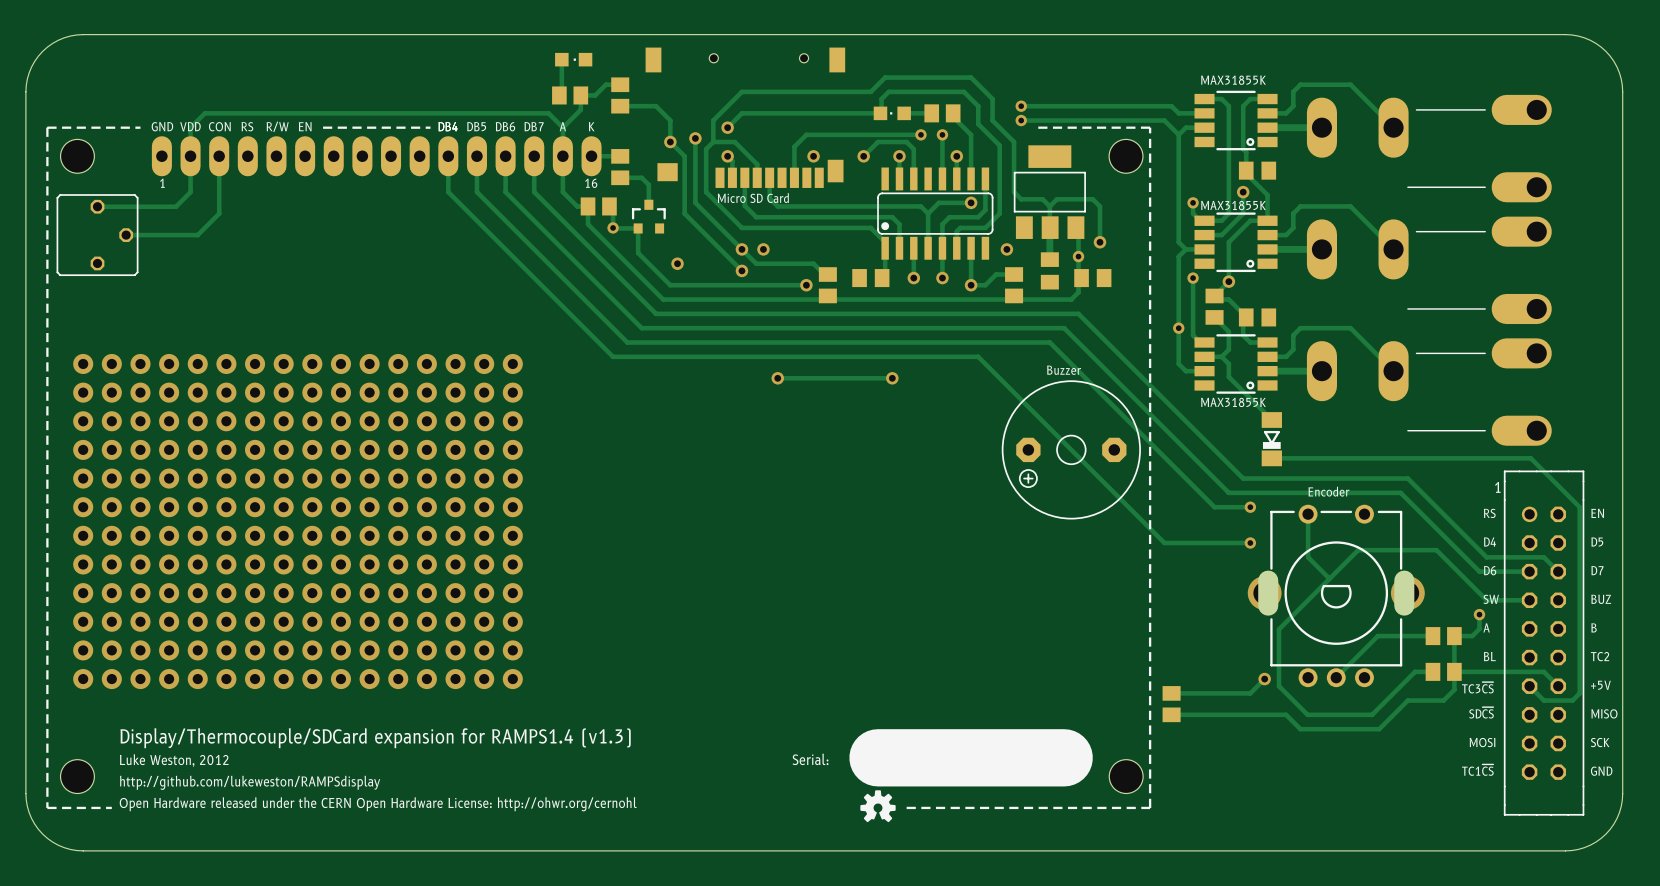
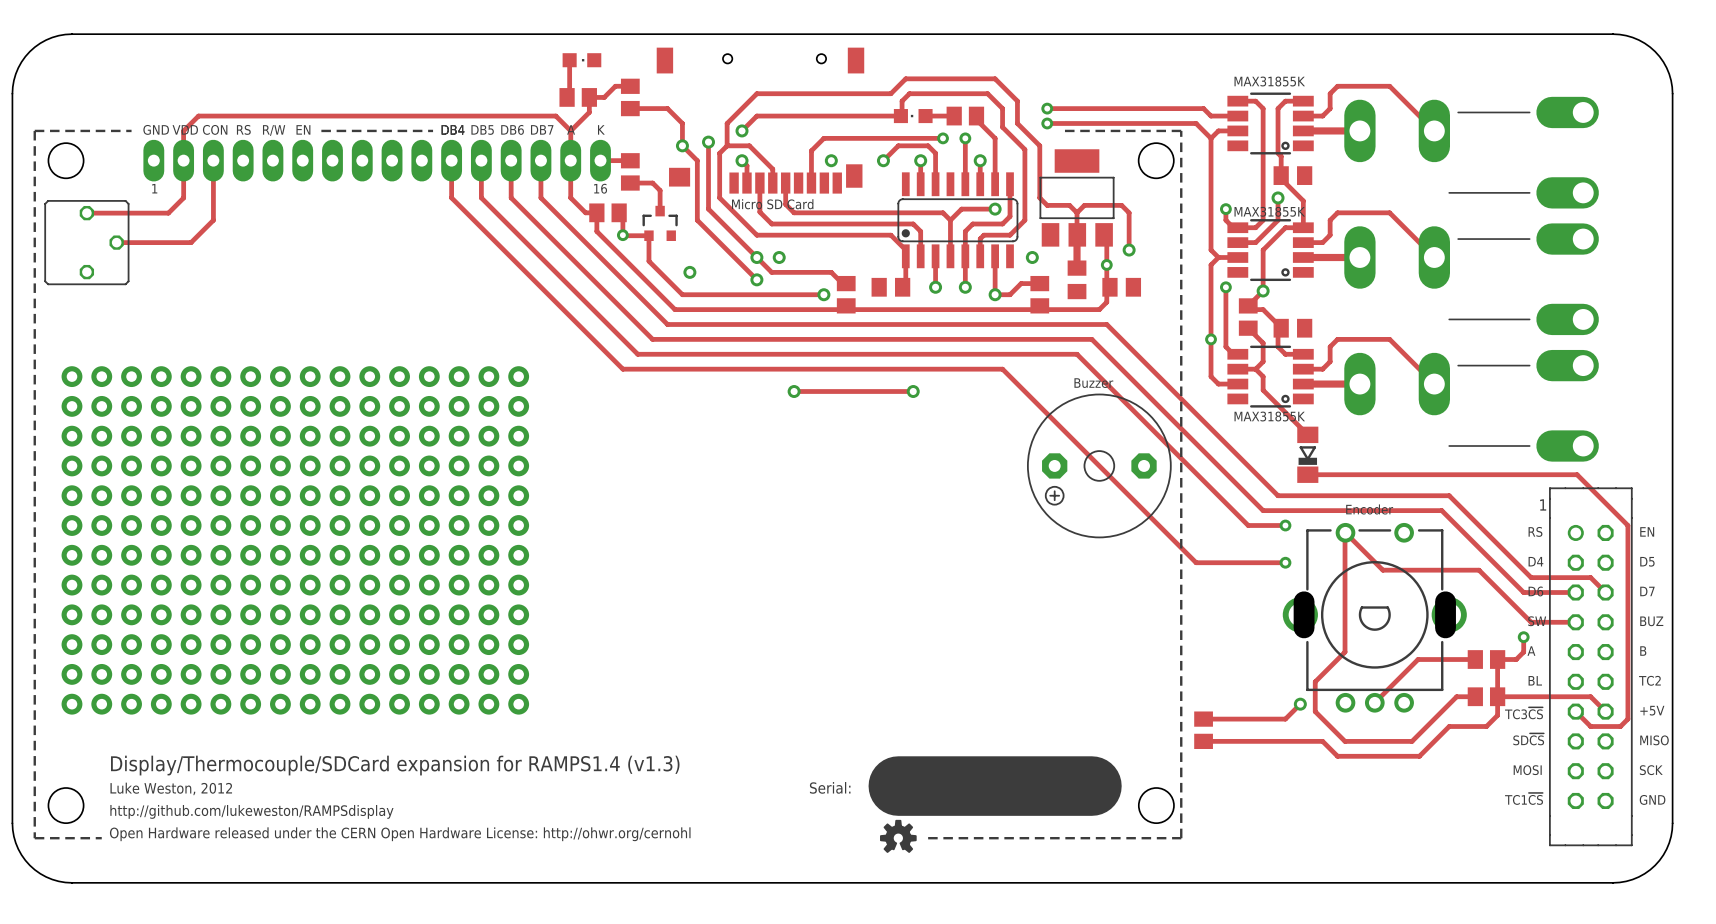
track: (1308, 514) (1308, 557) (1329, 578) -> none
track: (1358, 550) (1278, 629) (1278, 657) -> (1397, 570) (1382, 570) (1345, 533) (1345, 652) (1315, 681)

